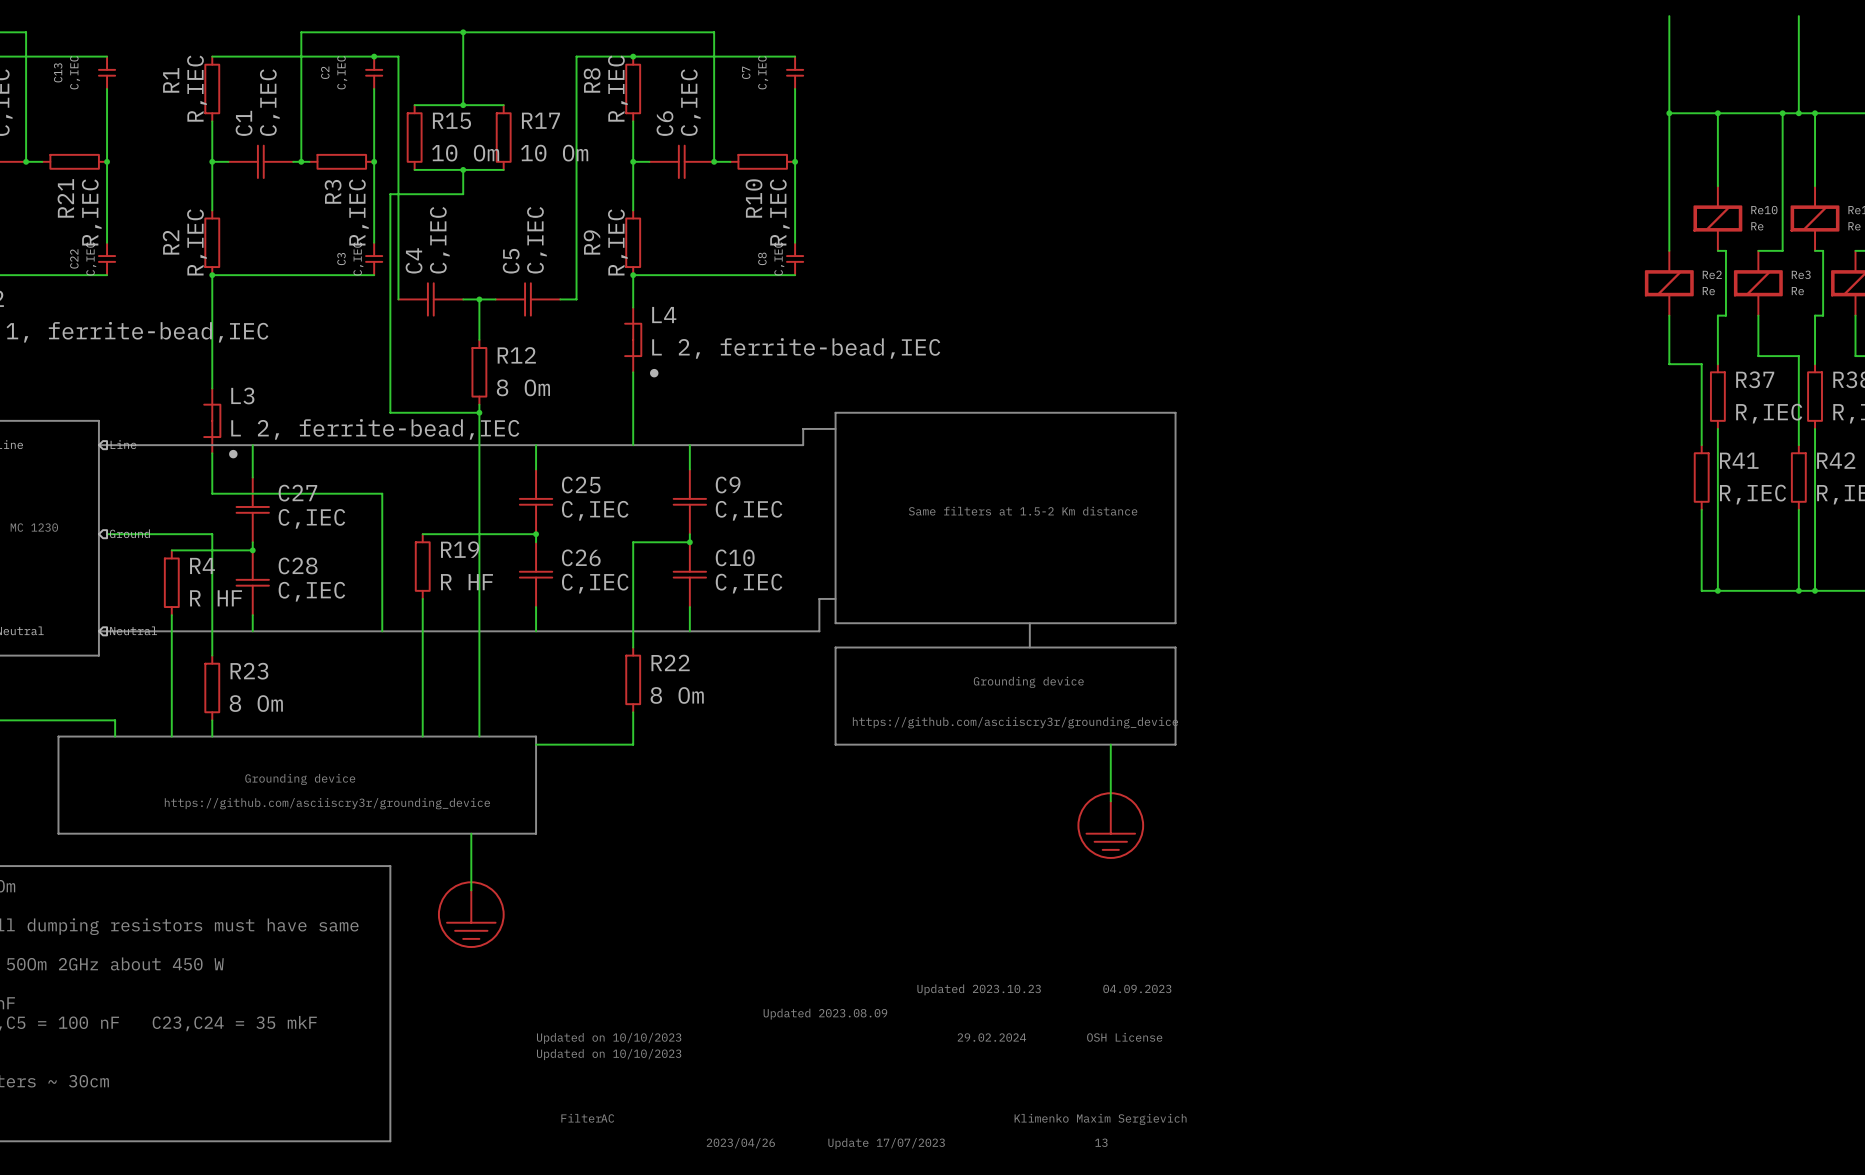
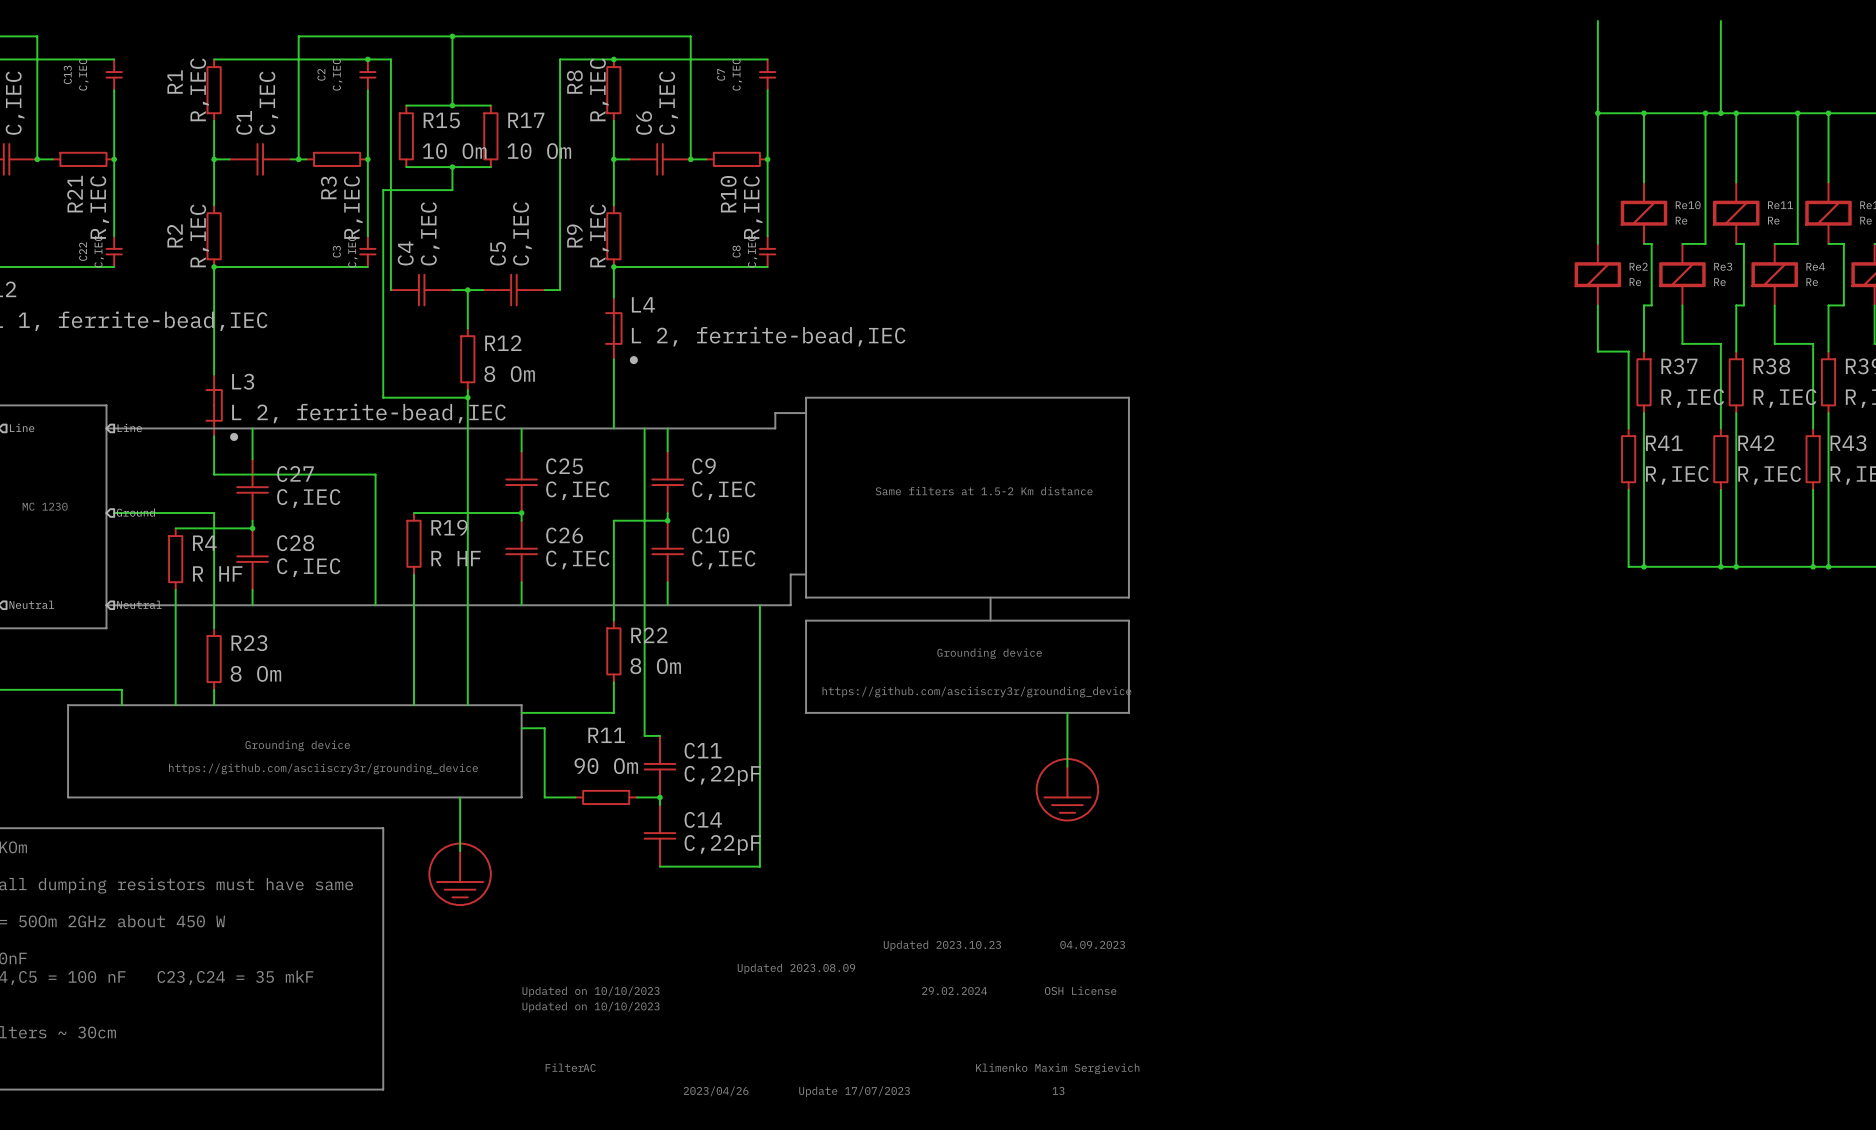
wire: none -> (644, 428) (644, 735) (659, 735)
wire: none -> (759, 605) (759, 866) (659, 866)
wire: none -> (521, 728) (544, 728) (544, 797) (575, 797)
C11: none -> C,22pF (659, 766)
R11: none -> 90 Om (606, 797)
wire: none -> (636, 797) (659, 797) (659, 805)
junction: none -> (659, 797)
C14: none -> C,22pF (659, 835)

